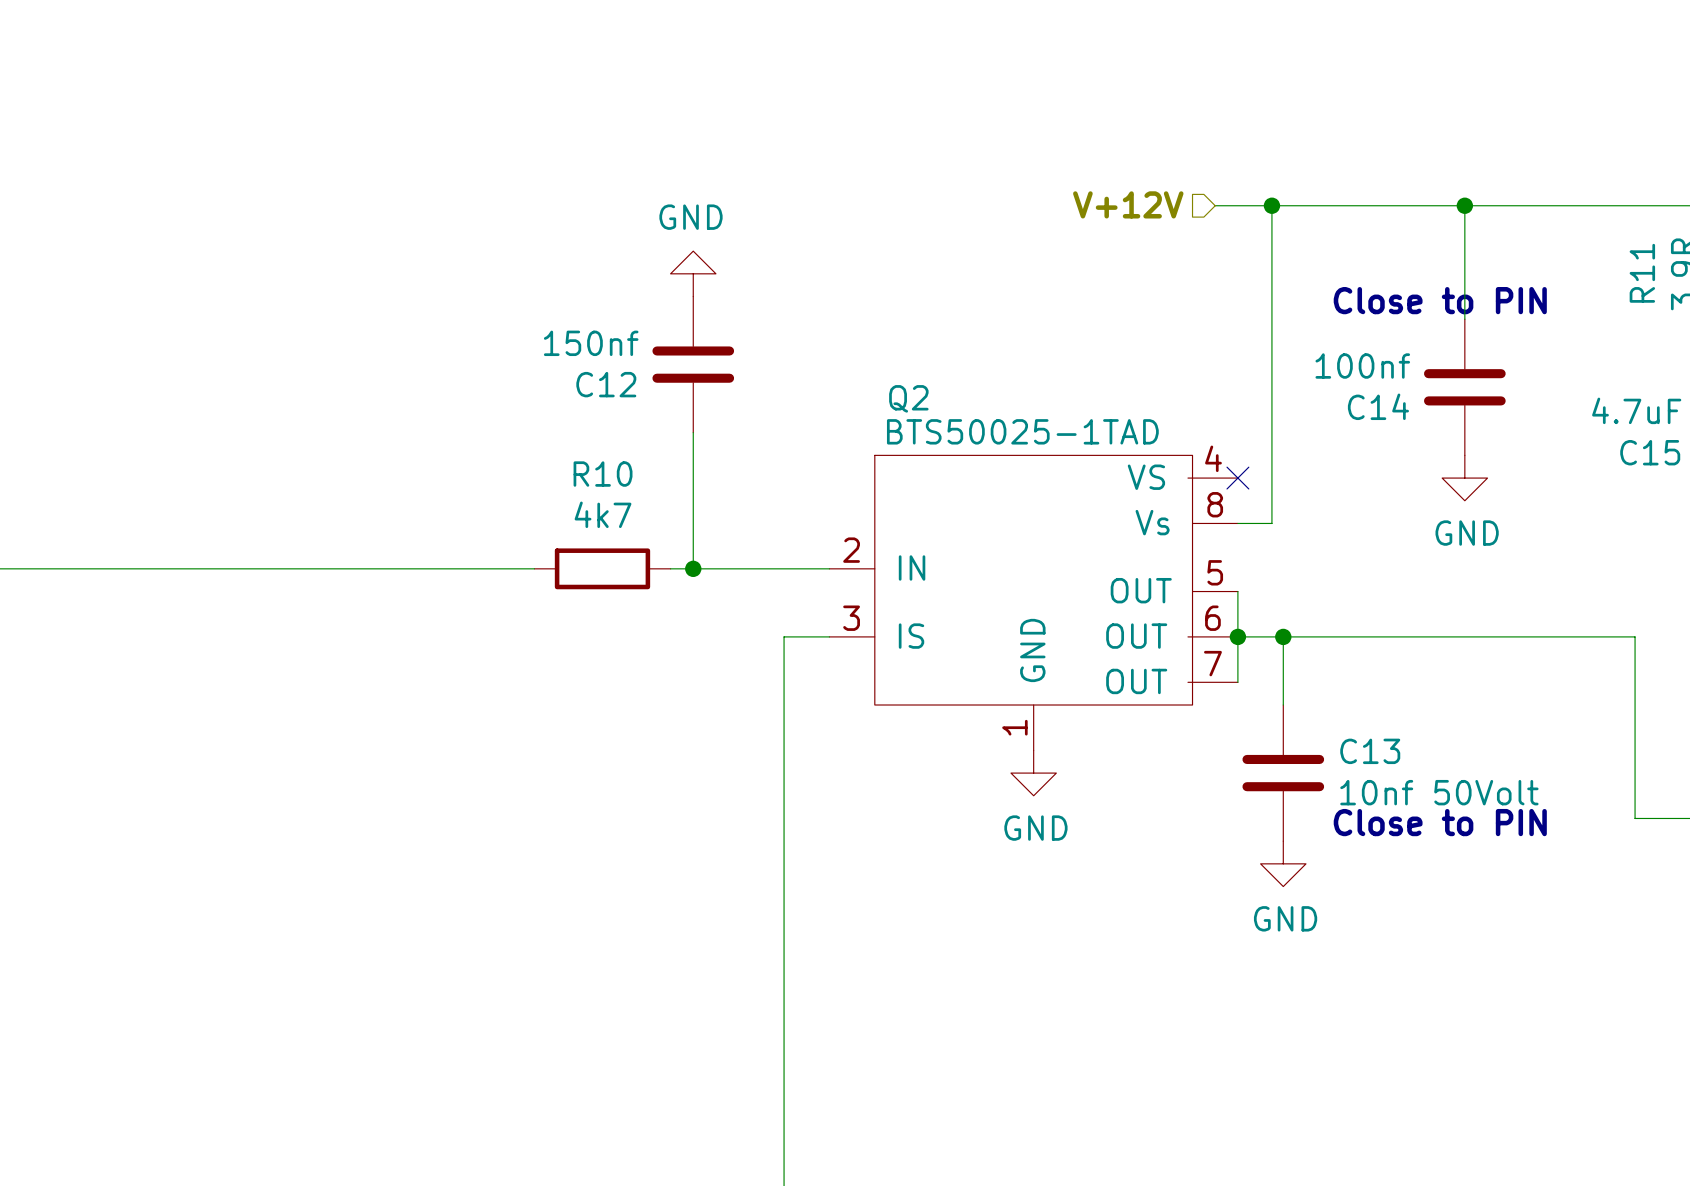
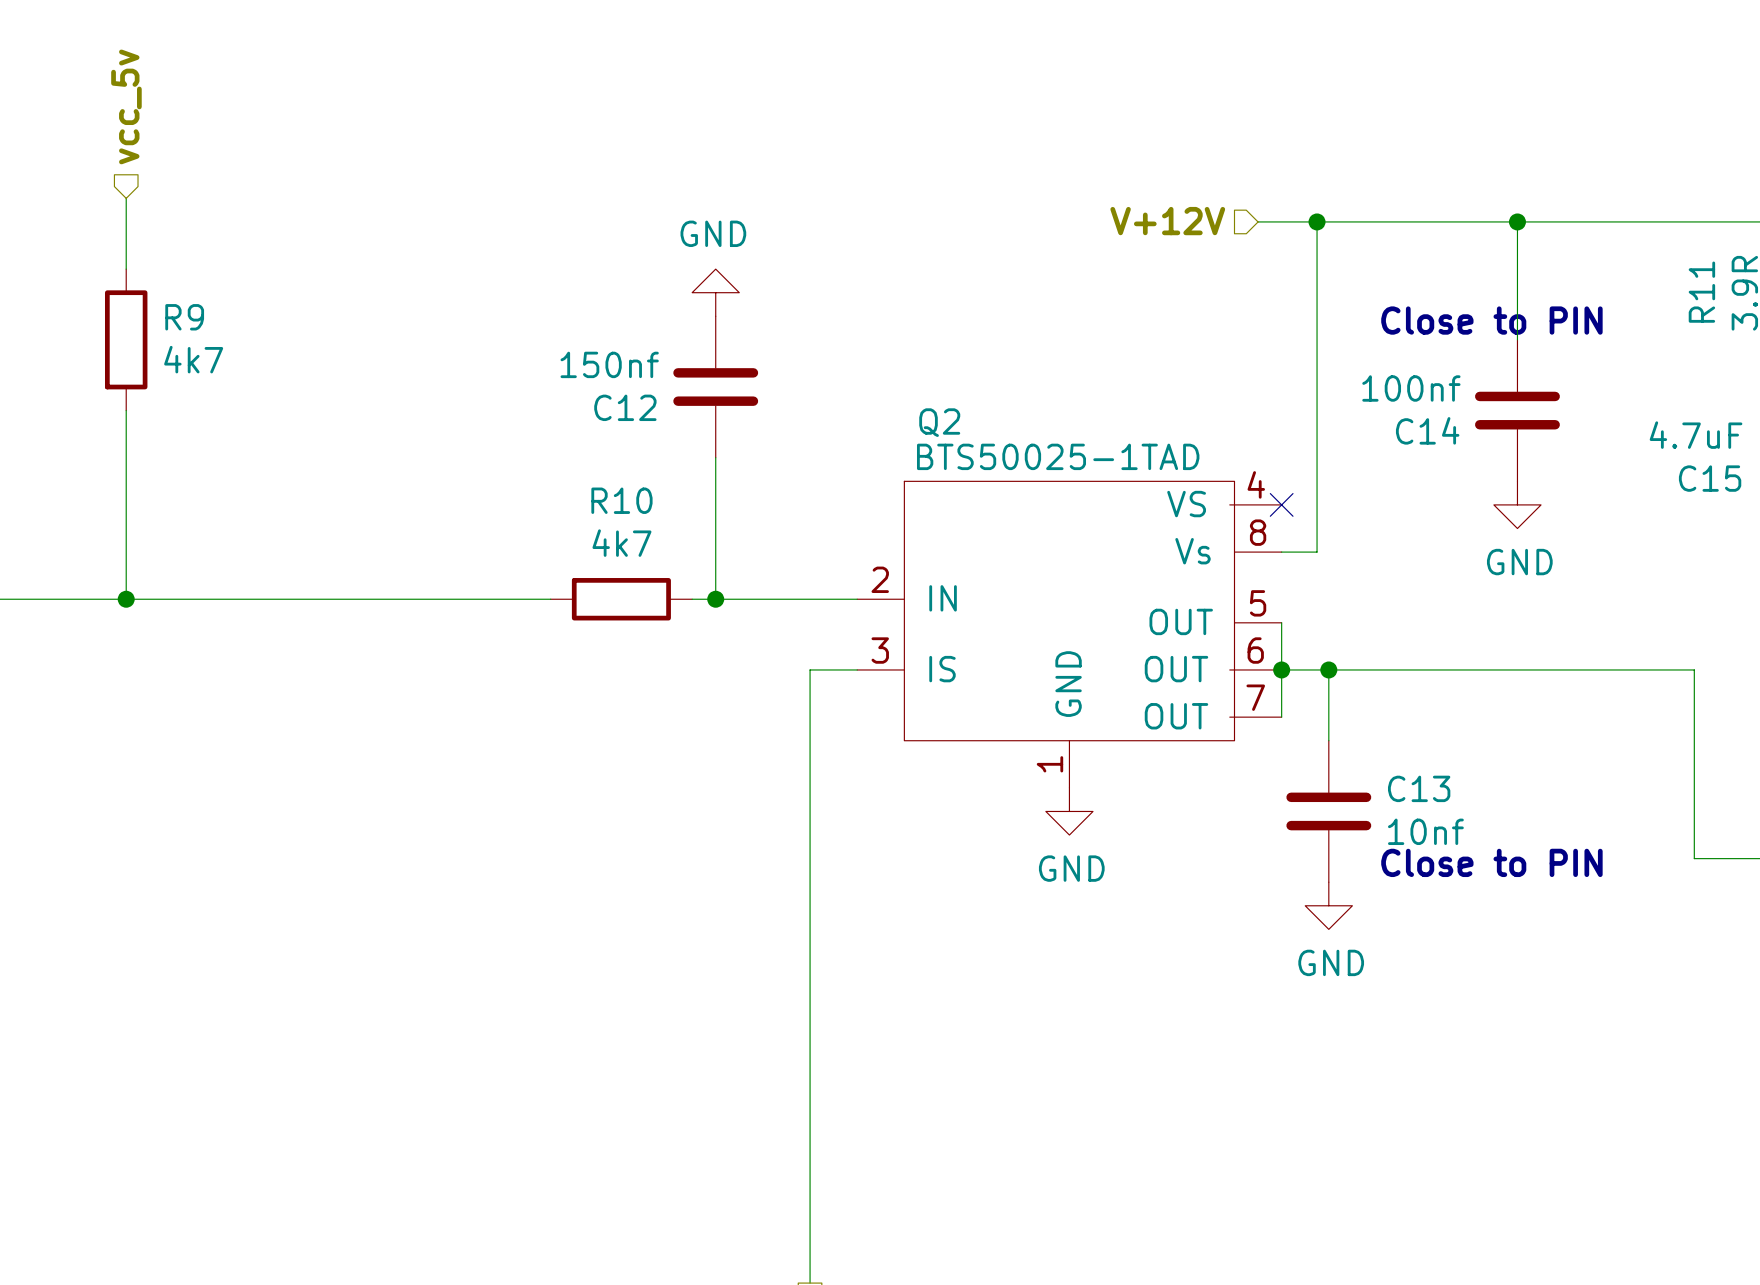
hierarchical label: none -> vcc_5v (126, 106)
wire: none -> (126, 198) (126, 269)
R9: none -> 4k7 (126, 339)
wire: none -> (126, 410) (126, 599)
junction: none -> (126, 599)
C13 value: 10nf 50Volt (1439, 792) -> 10nf (1425, 831)

